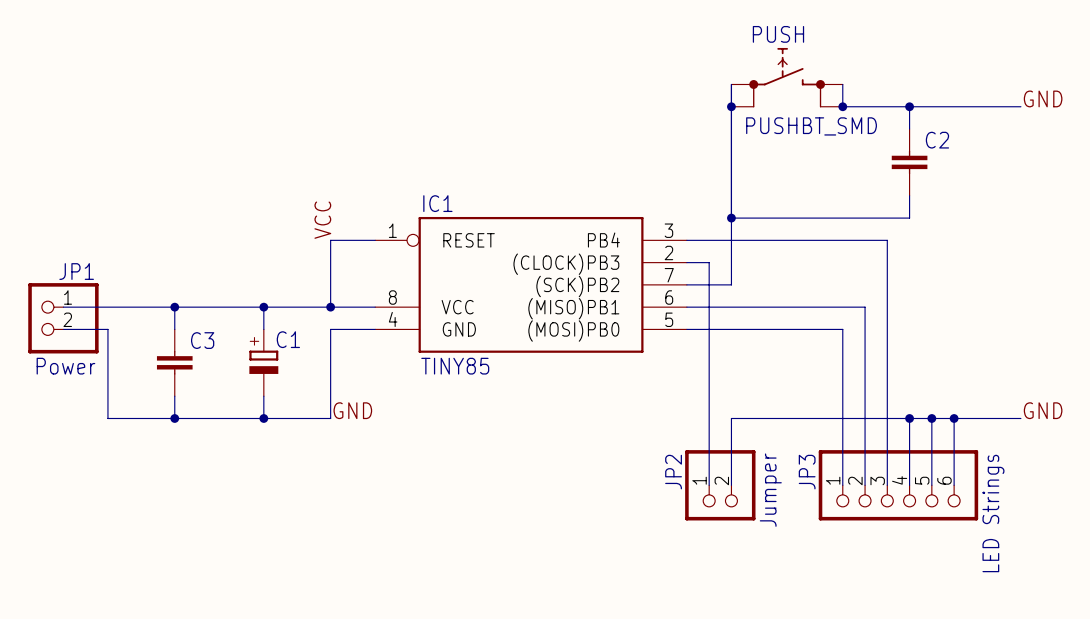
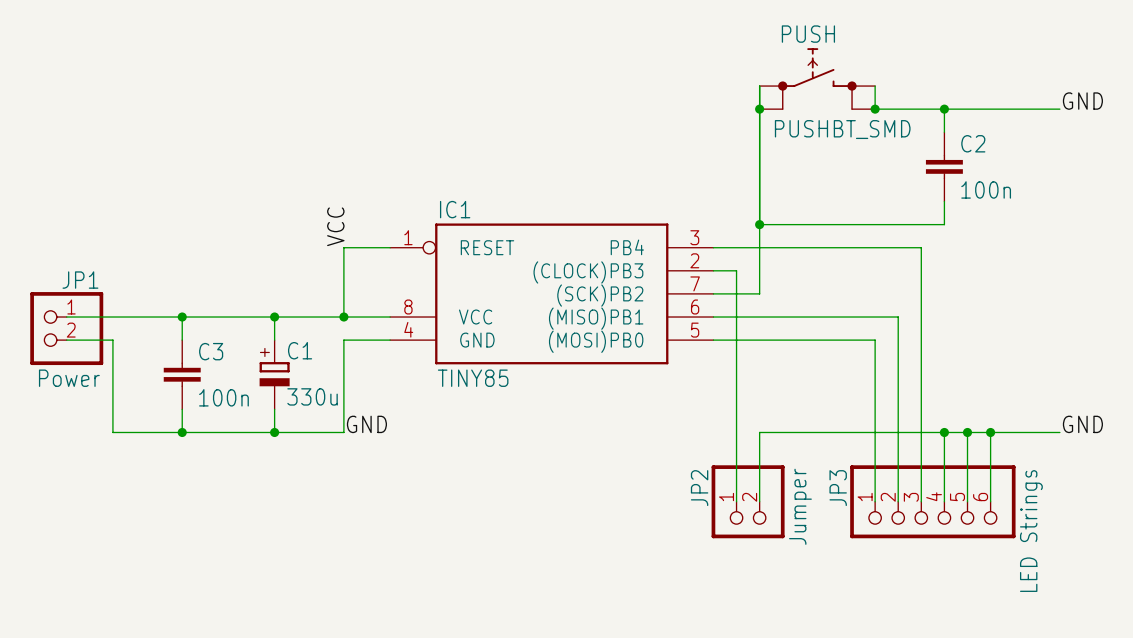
C2 value: none -> 100n (986, 189)
C1 value: none -> 330u (312, 396)
C3 value: none -> 100n (223, 397)

